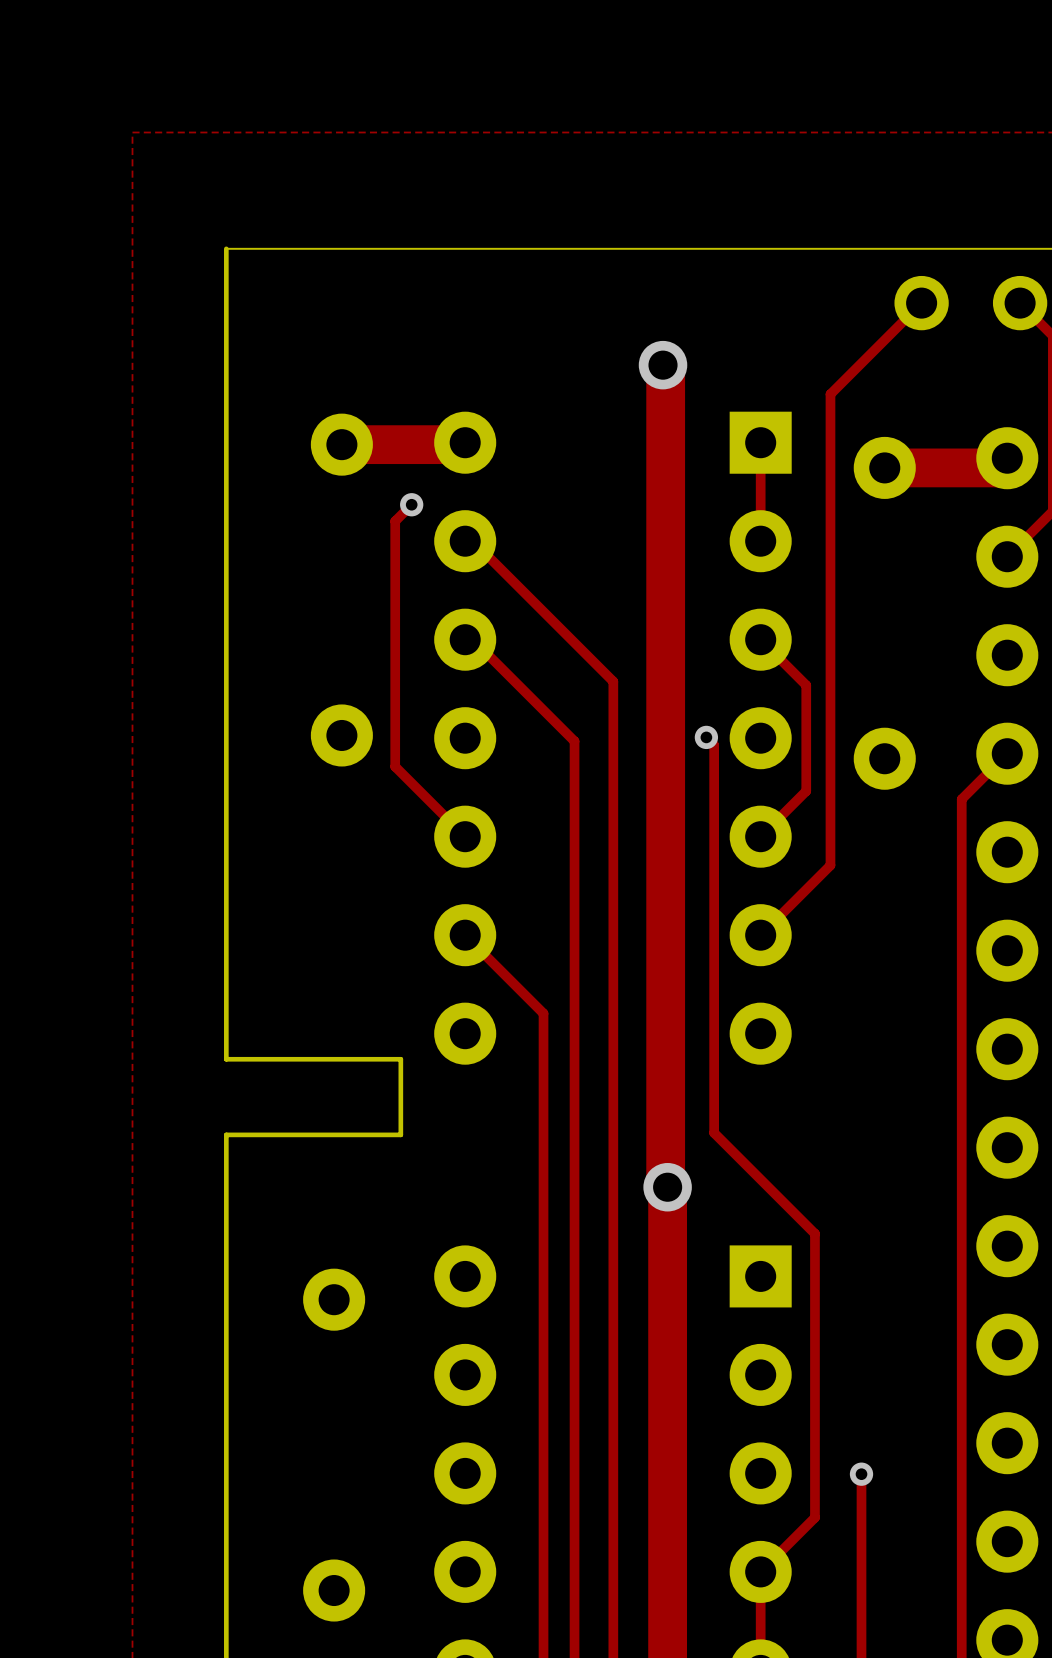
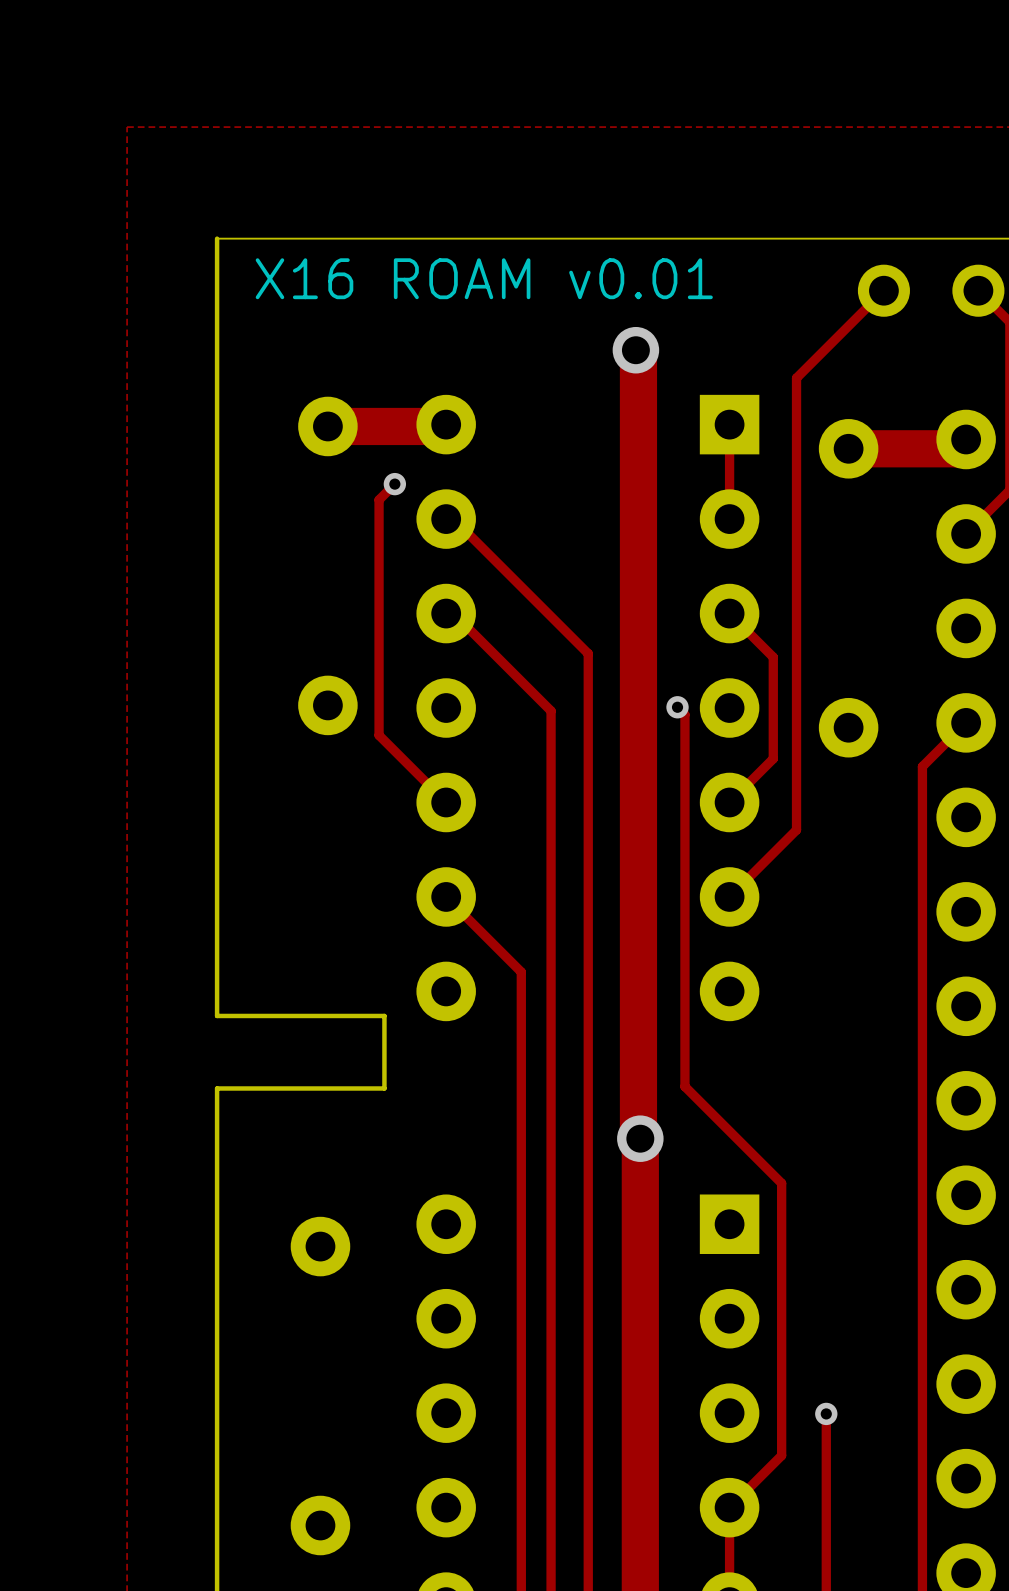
text: none -> X16 ROAM v0.01 (484, 278)

